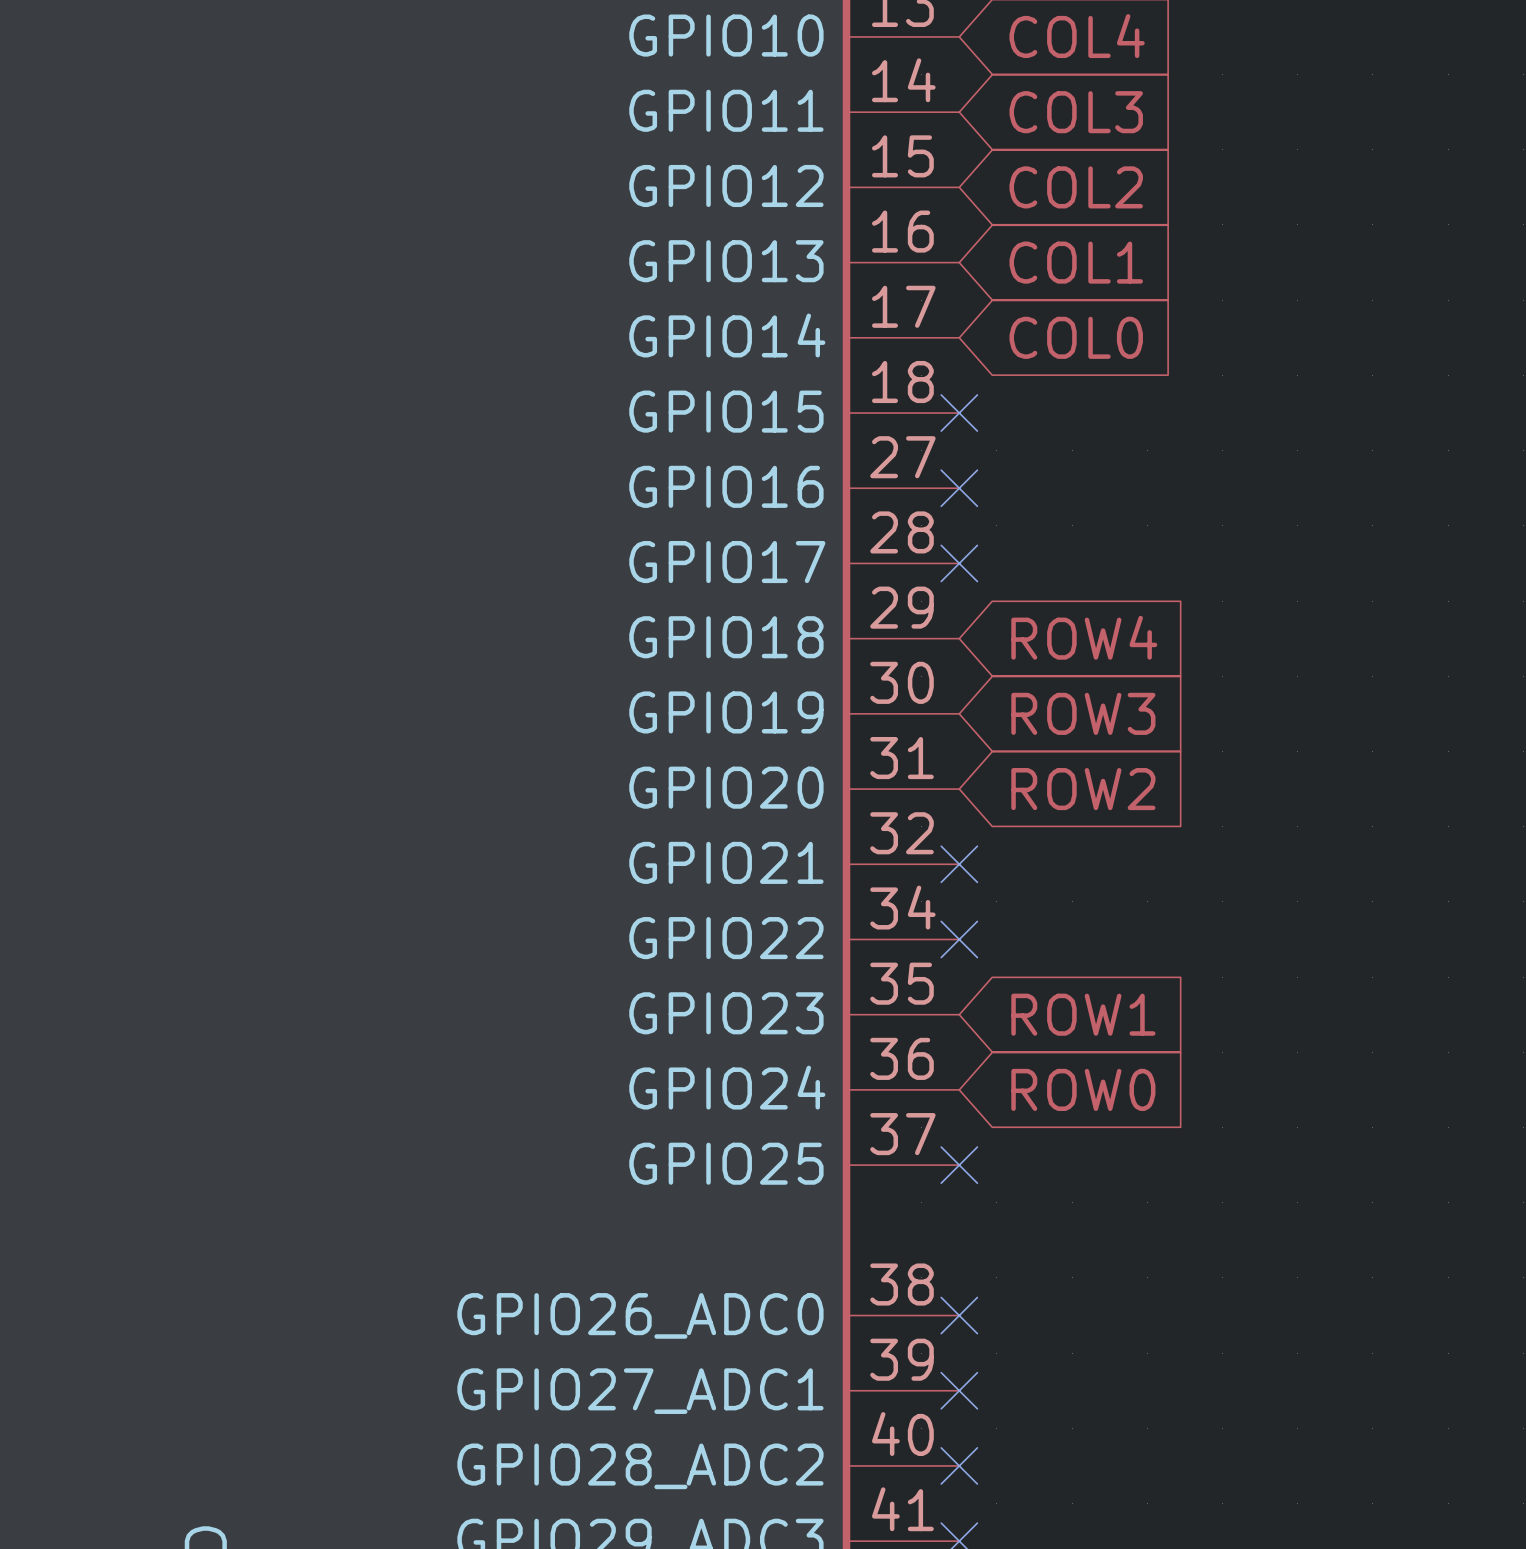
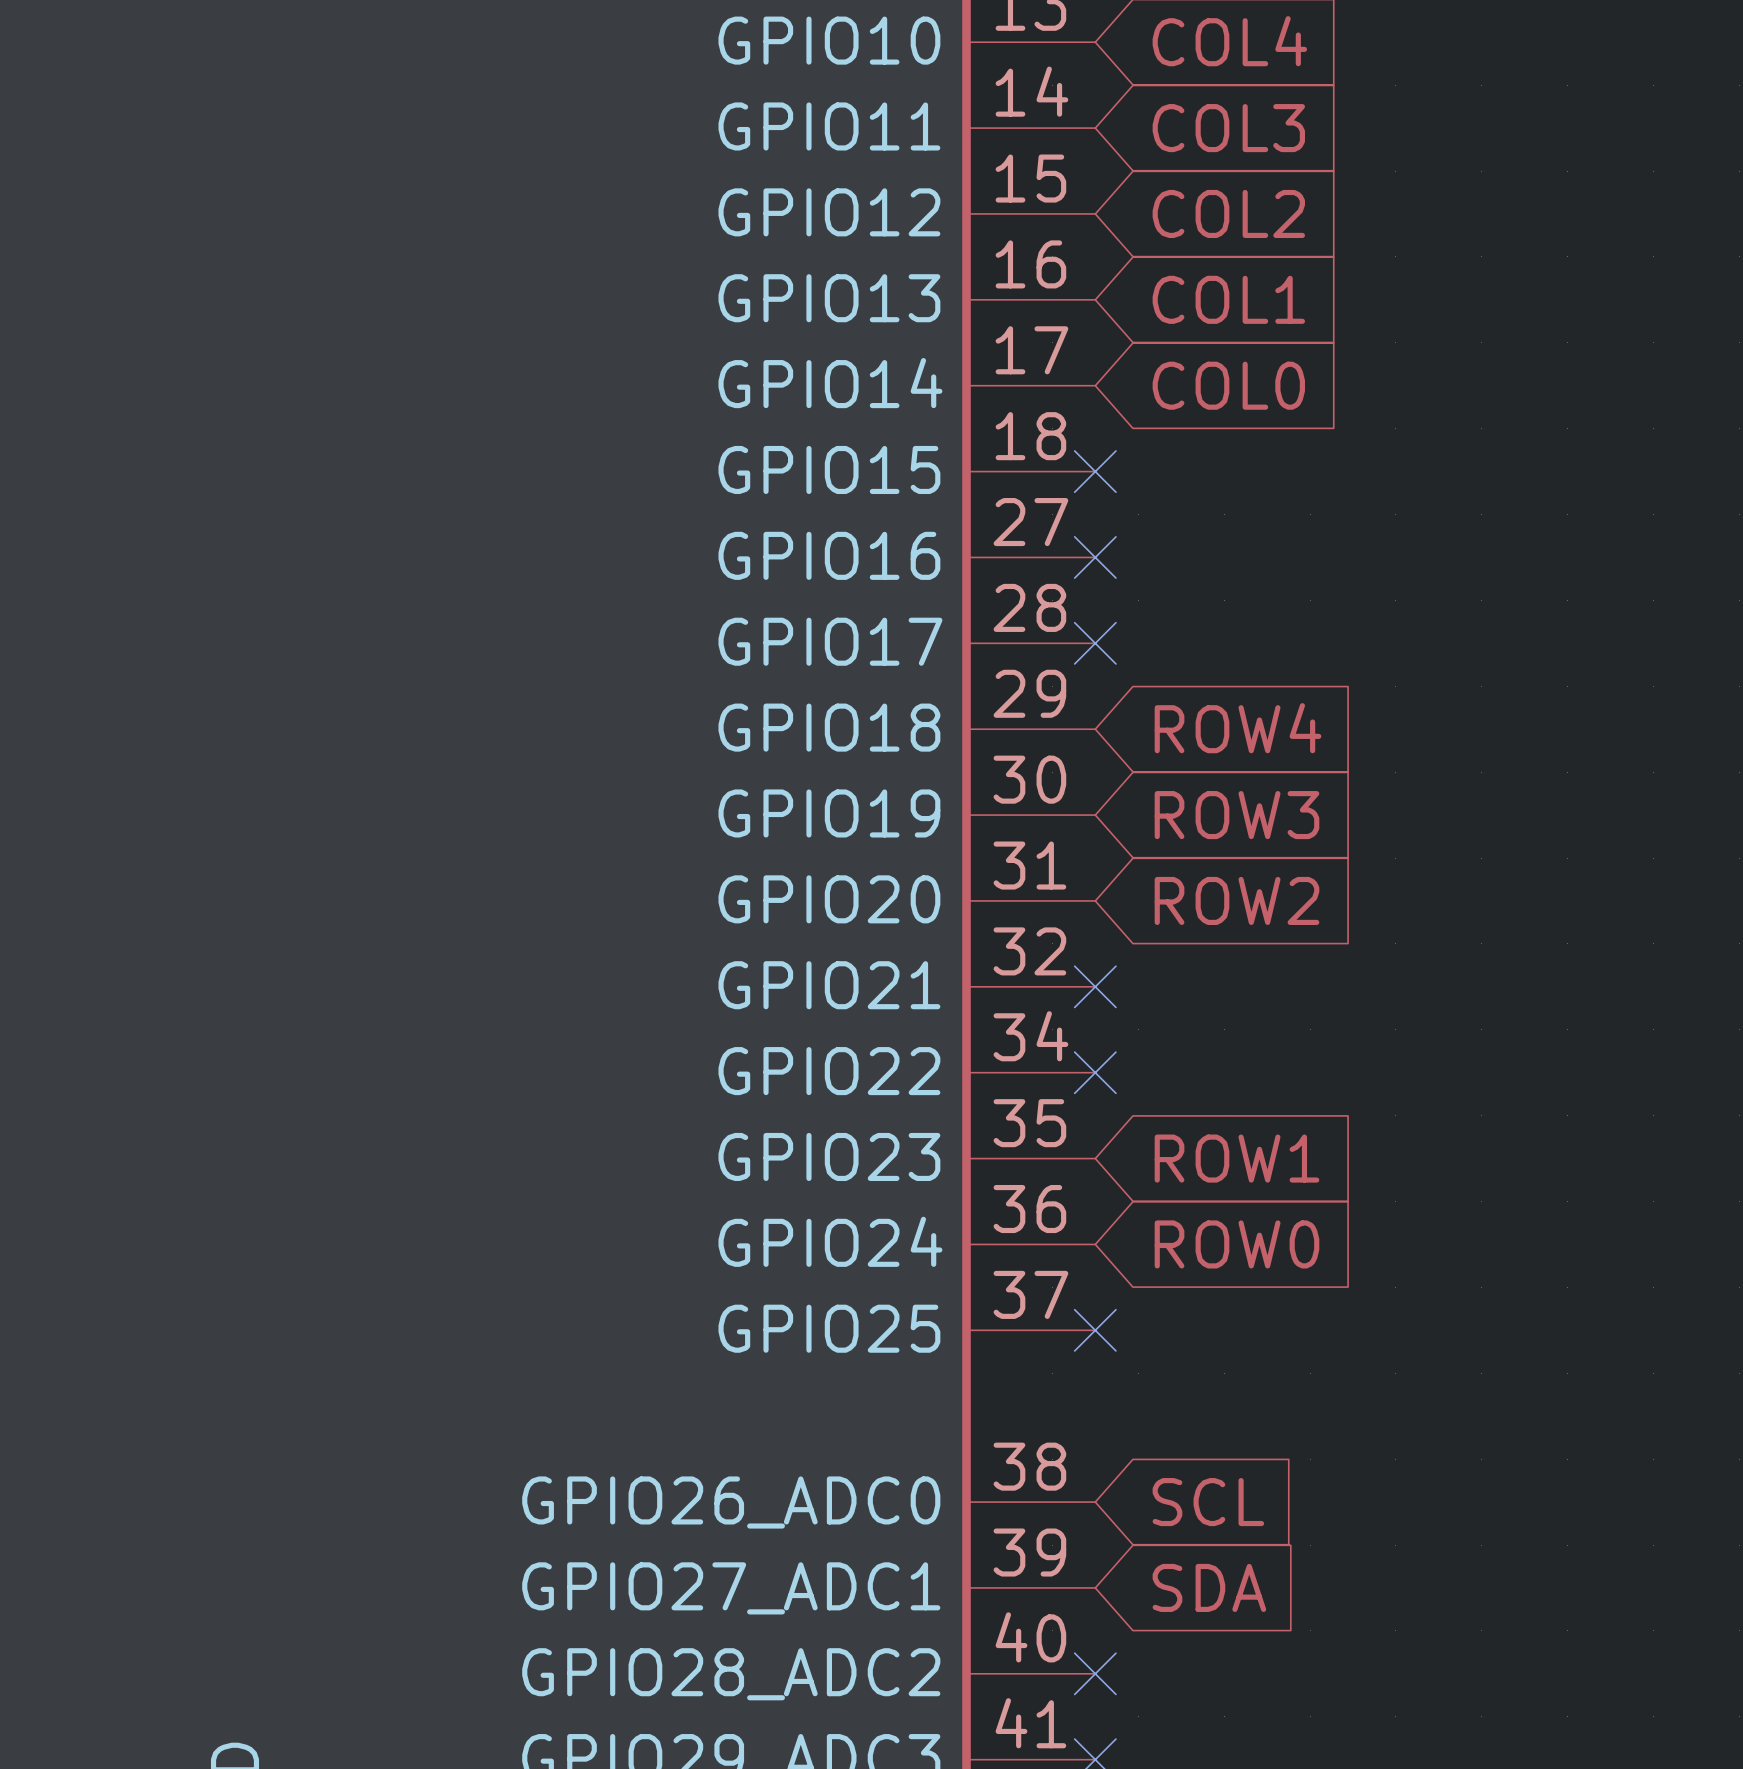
no-connect mark: (959, 1315) -> none
global label: none -> SCL (1208, 1502)
no-connect mark: (959, 1390) -> none
global label: none -> SDA (1209, 1587)

